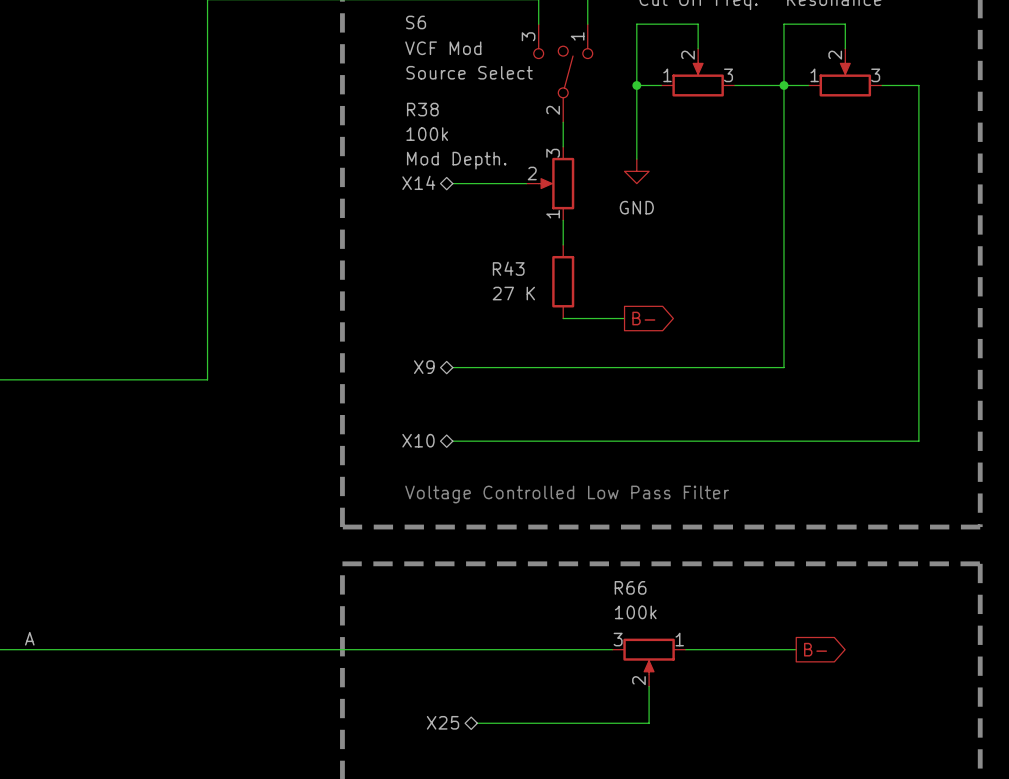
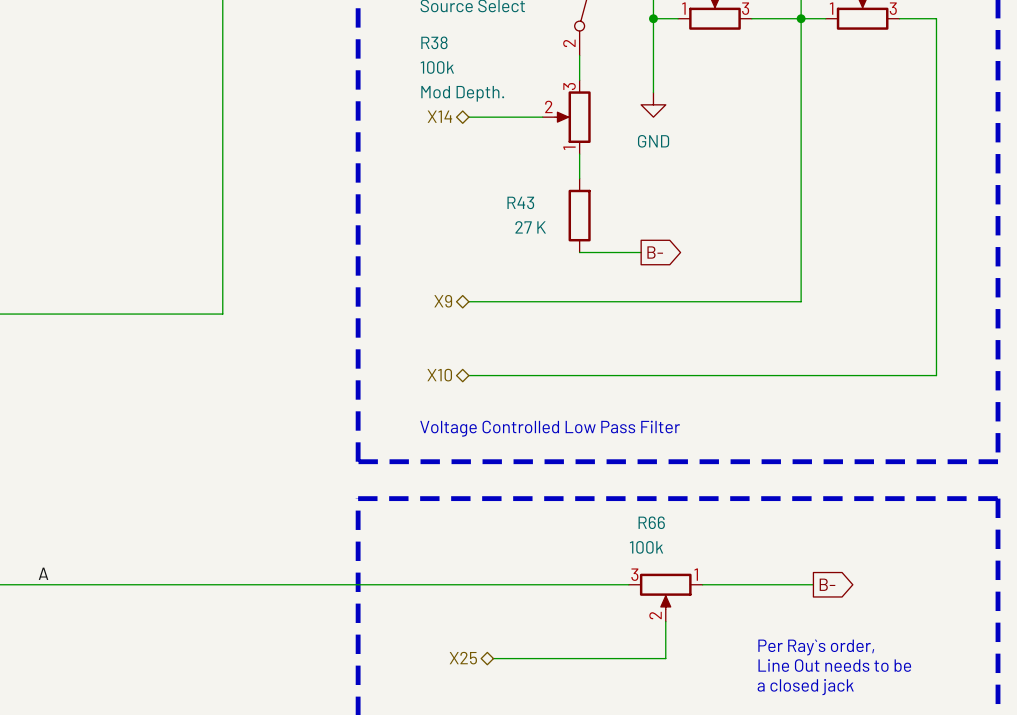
text: none -> Per Ray`s order, (816, 647)
text: none -> Line Out needs to be (834, 665)
text: none -> a closed jack (805, 687)

